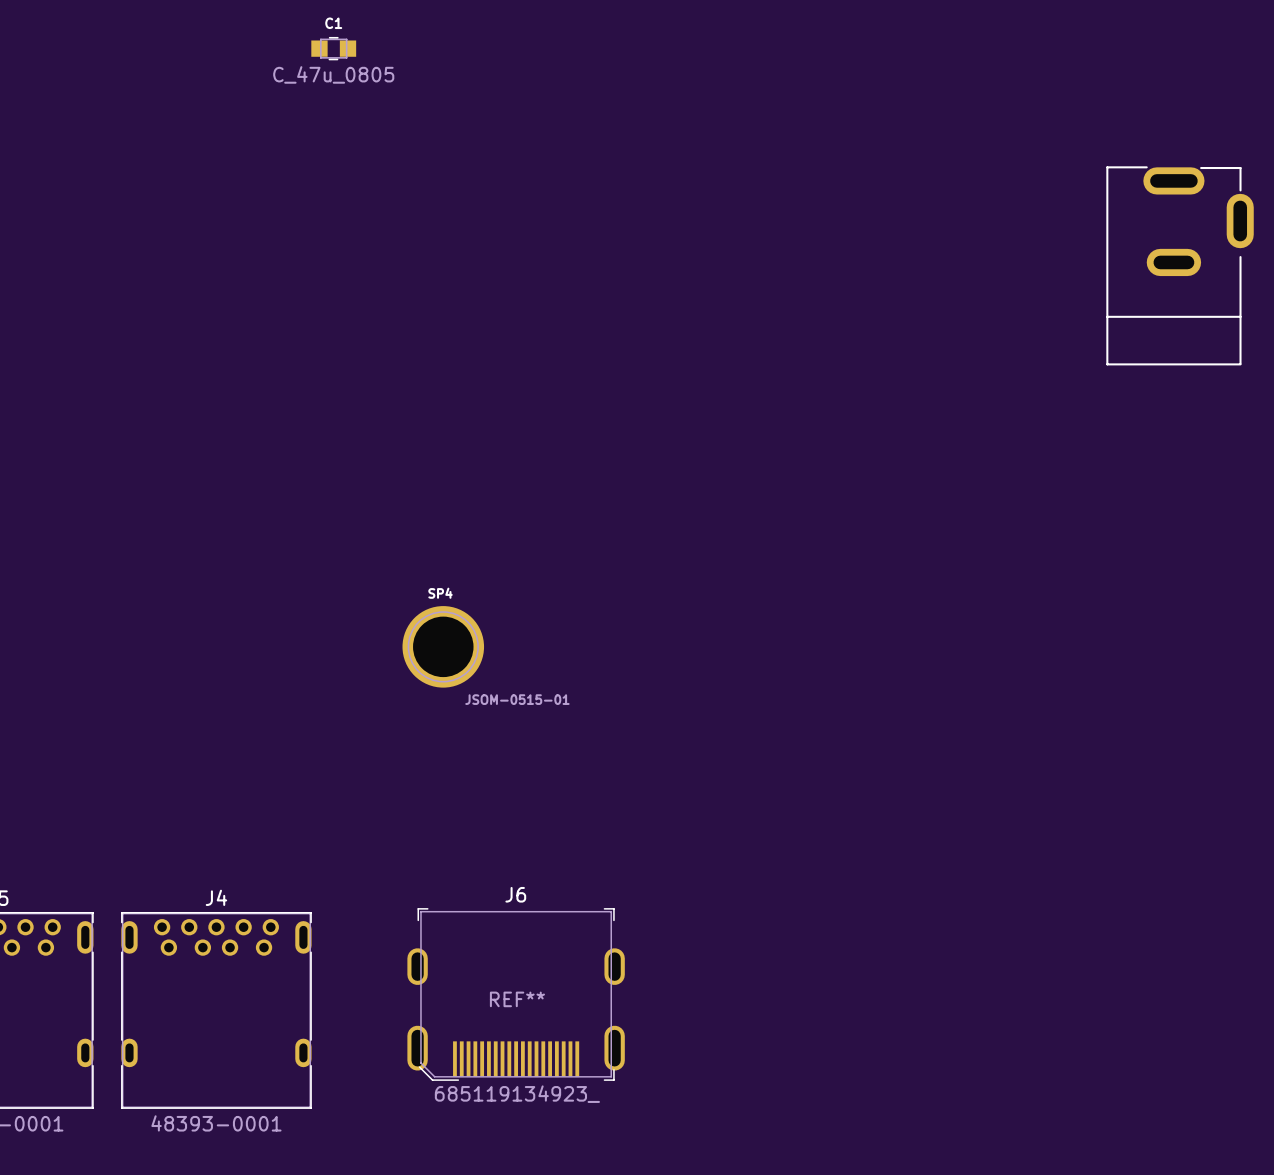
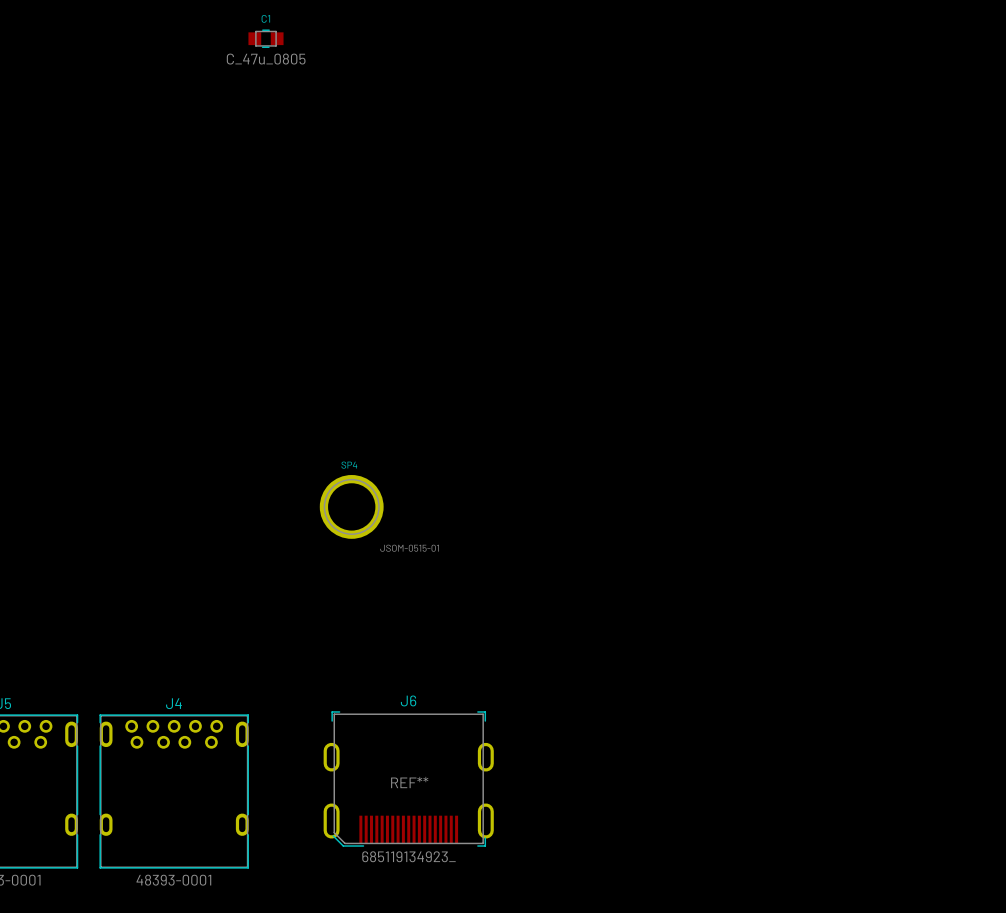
part: (1180, 265) -> none

